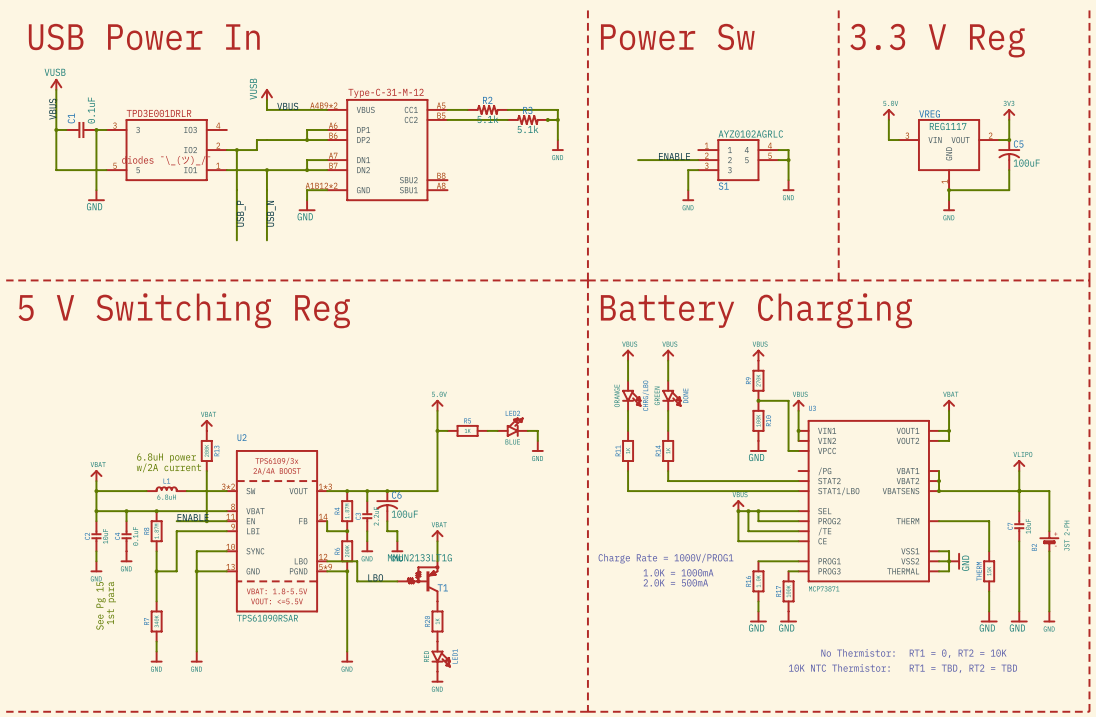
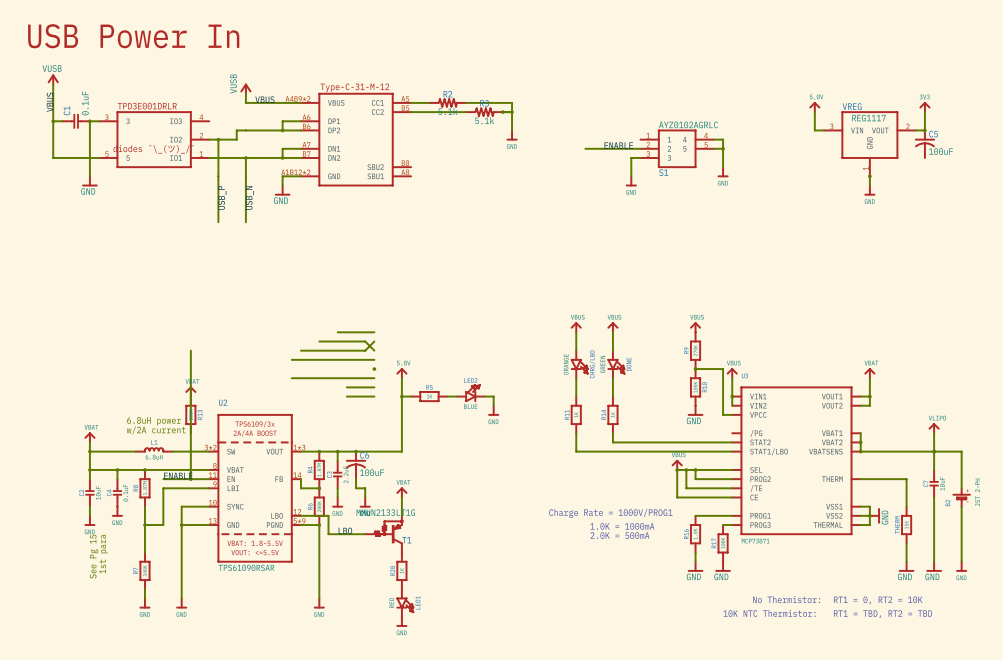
line: (587, 9) (587, 711) -> none
line: (838, 9) (838, 280) -> none
line: (1089, 9) (1089, 711) (6, 711) -> none
text: Power Sw (677, 37) -> none
text: 3.3 V Reg (937, 40) -> none
wire: (1009, 170) (1009, 190) (949, 190) -> none
line: (6, 280) (1089, 280) -> none
text: 5 V Switching Reg (184, 310) -> none
text: Battery Charging (756, 310) -> none
wire: none -> (337, 332) (374, 332)
wire: none -> (319, 341) (365, 341) (374, 350)
wire: none -> (374, 341) (365, 350) (300, 350)
wire: none -> (190, 350) (190, 433)
wire: none -> (291, 359) (374, 359)
junction: none -> (374, 369)
wire: none -> (291, 378) (374, 378)
wire: none -> (346, 387) (374, 387)
wire: none -> (346, 396) (374, 396)

